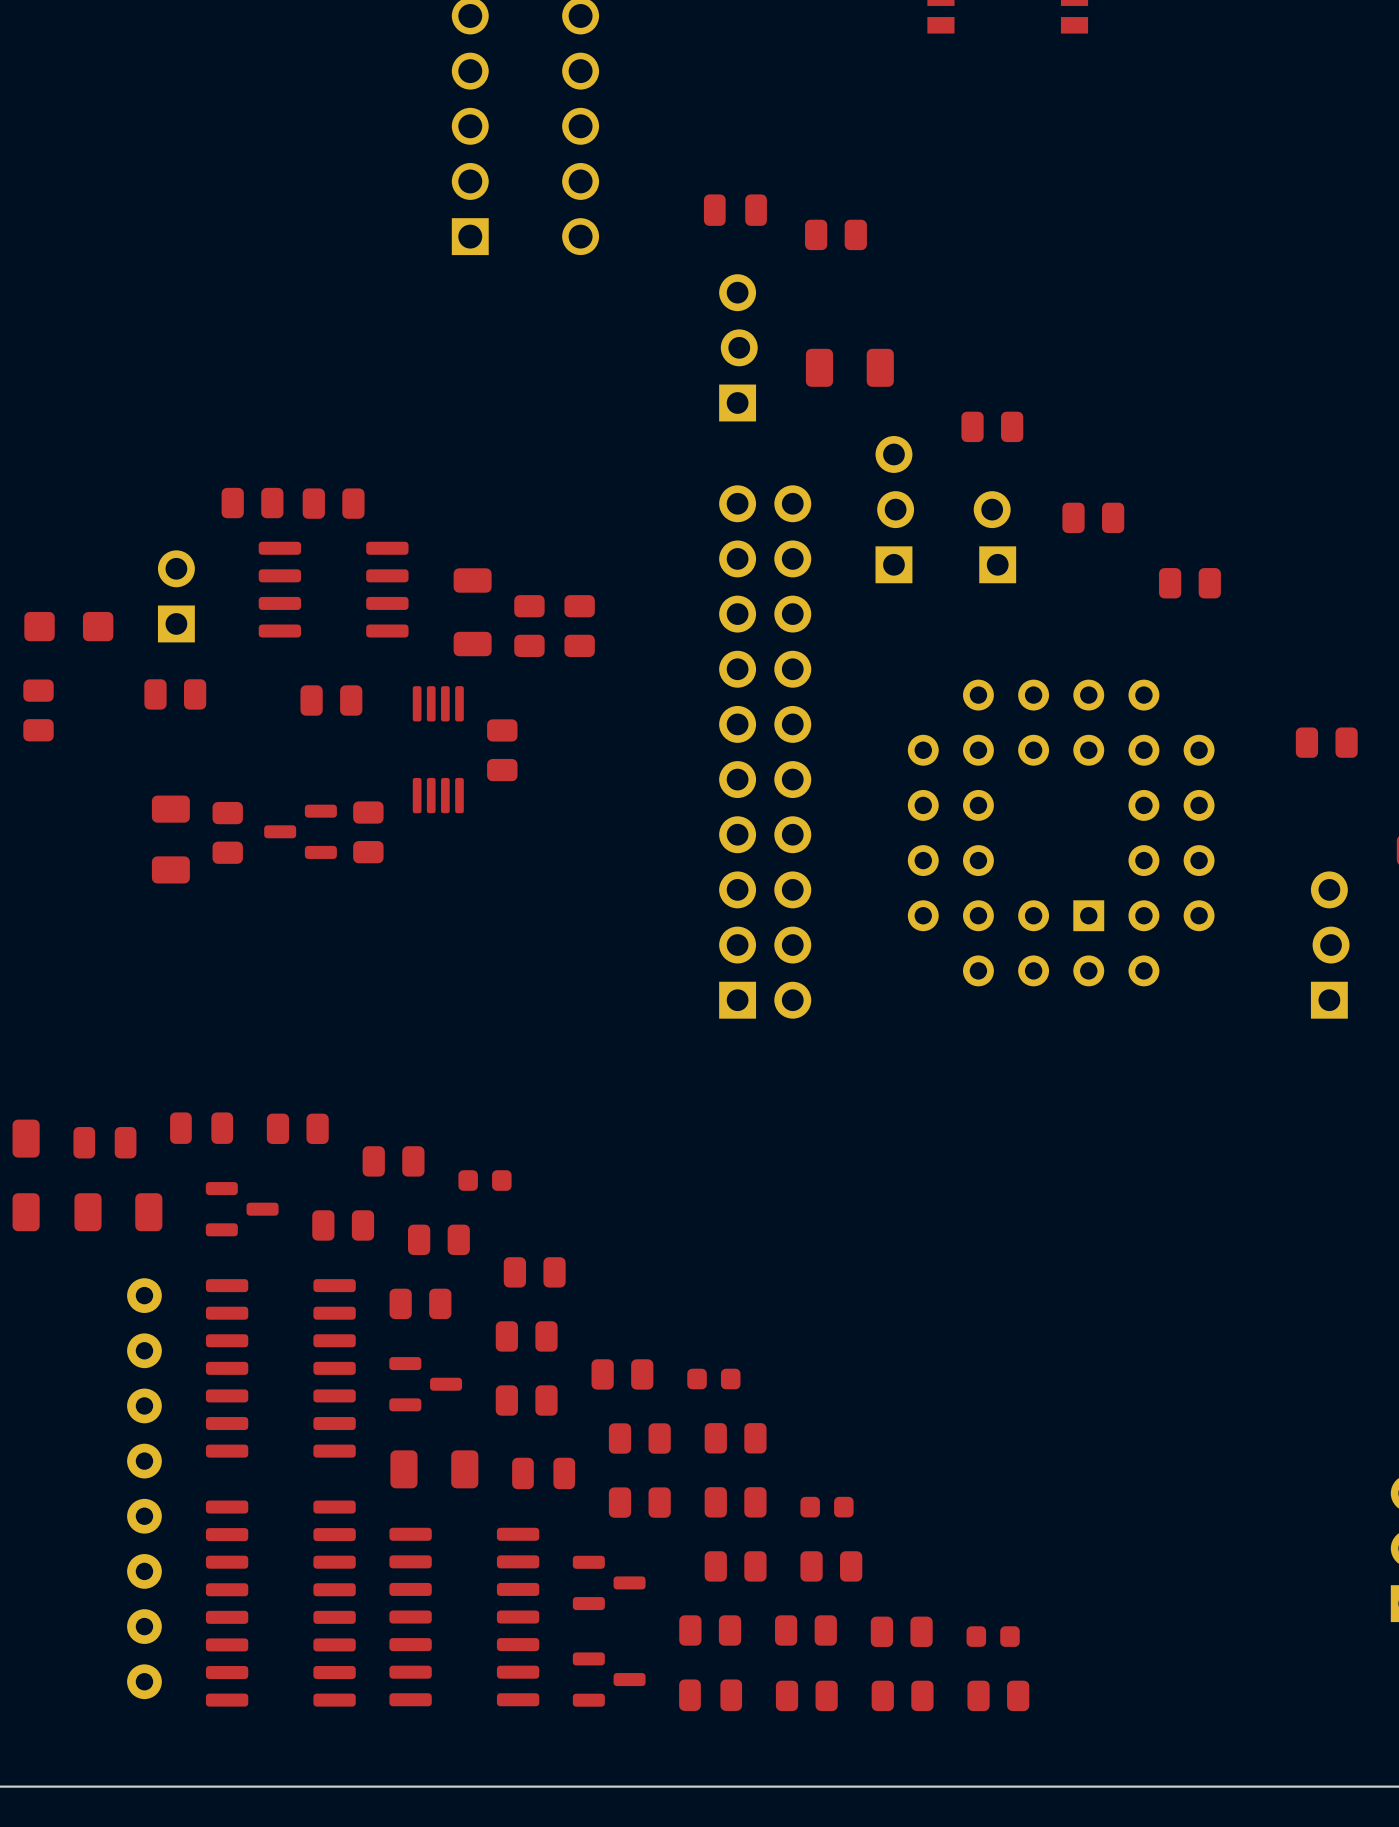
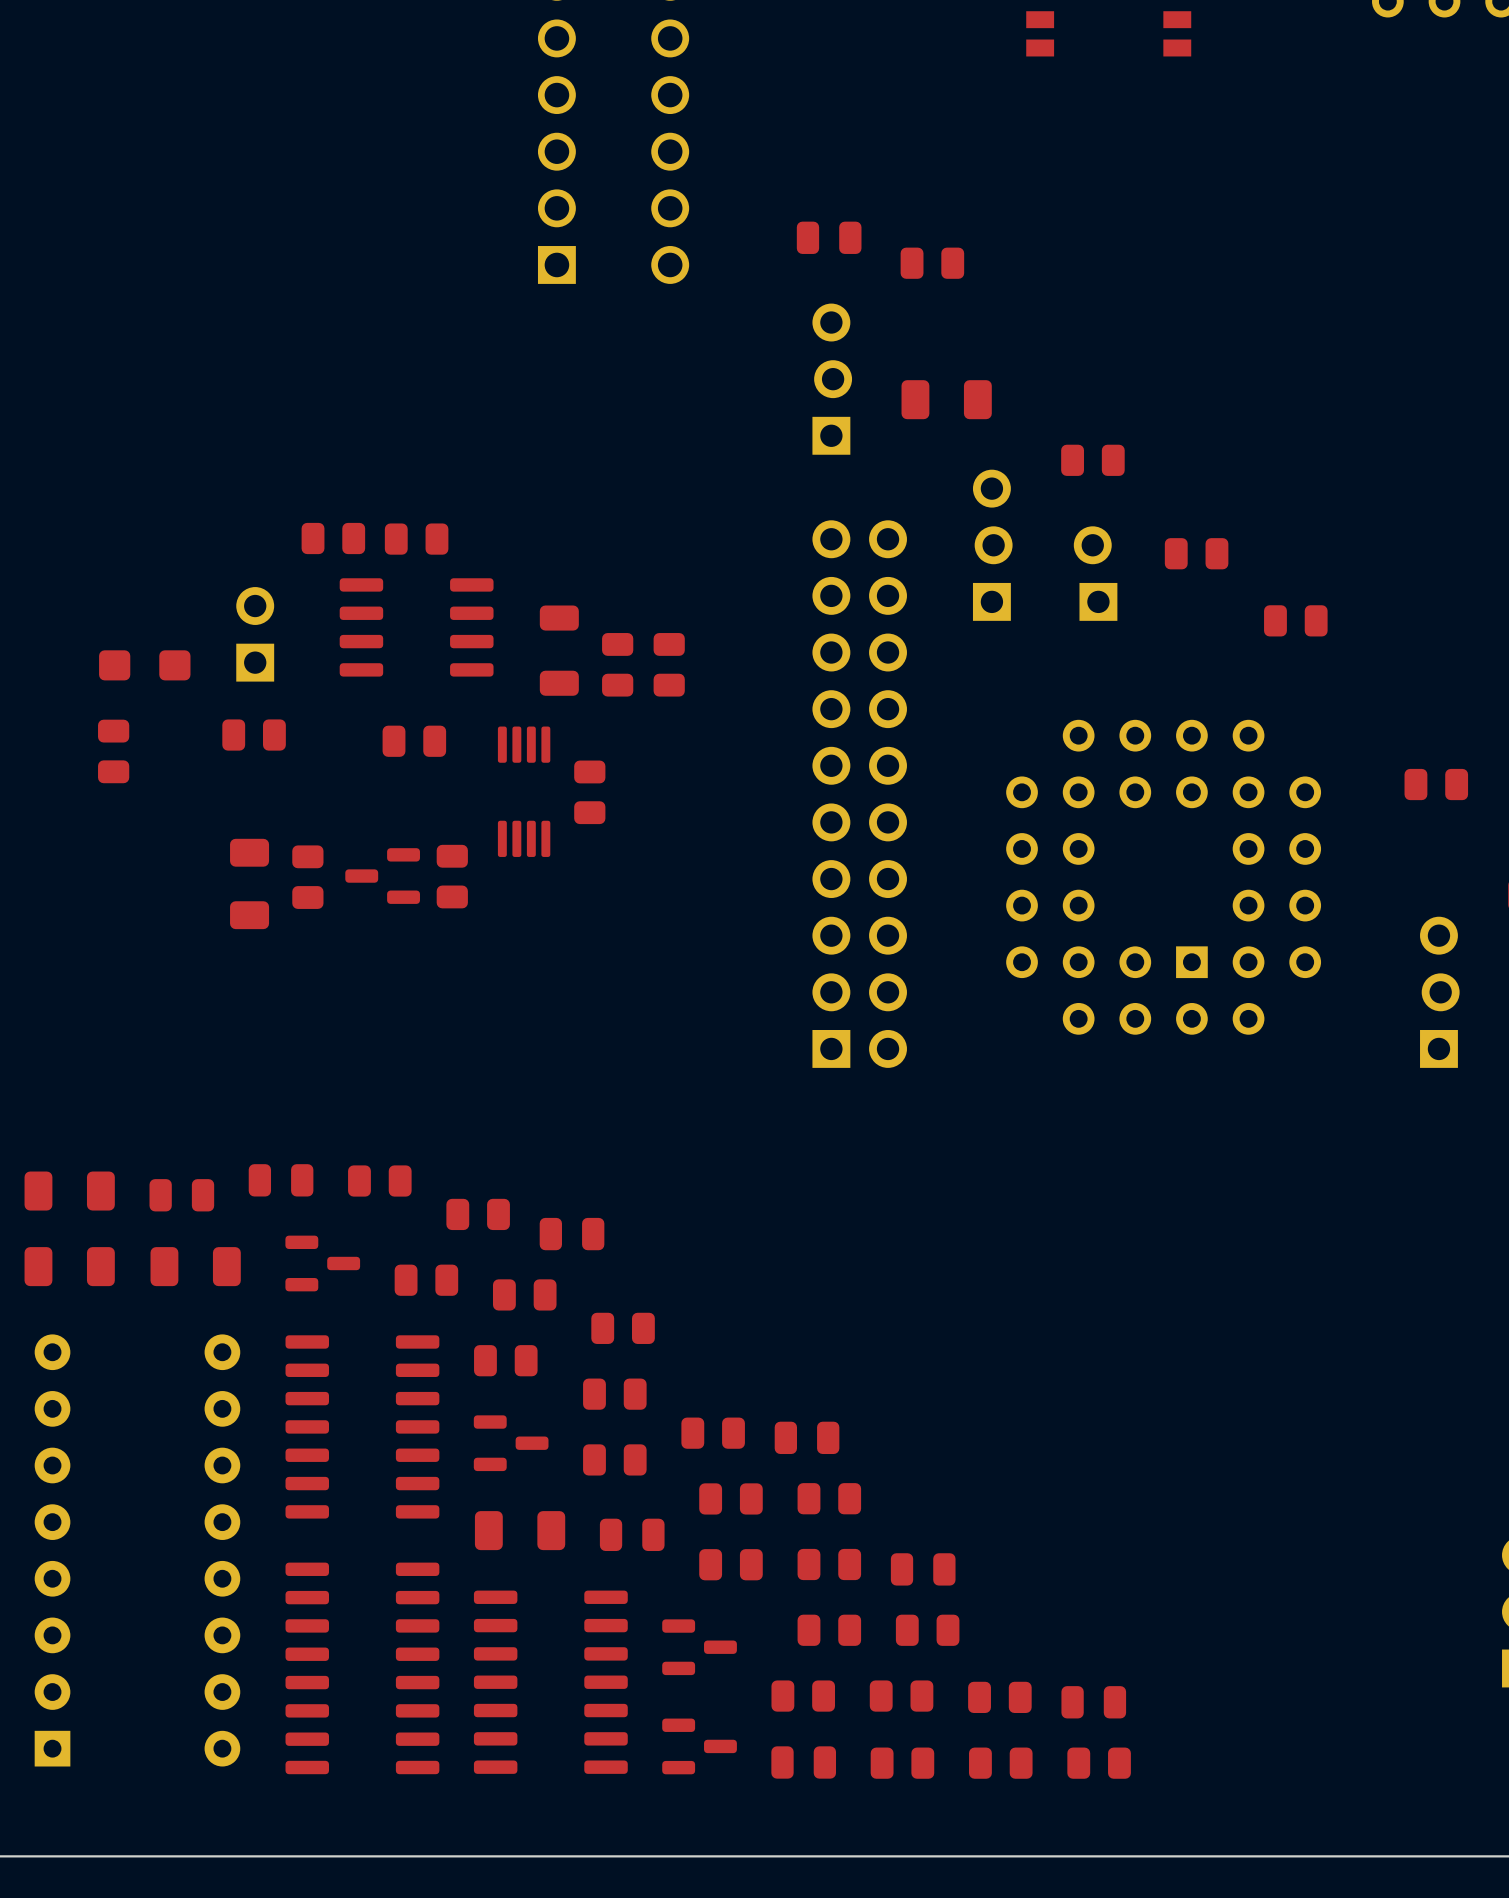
part footprint: [458, 1170, 512, 1191] -> [539, 1217, 605, 1251]
part footprint: [687, 1368, 741, 1390] -> [774, 1421, 840, 1455]
part footprint: [800, 1496, 854, 1518] -> [890, 1553, 956, 1586]
part footprint: [966, 1626, 1020, 1647] -> [1061, 1686, 1127, 1719]

